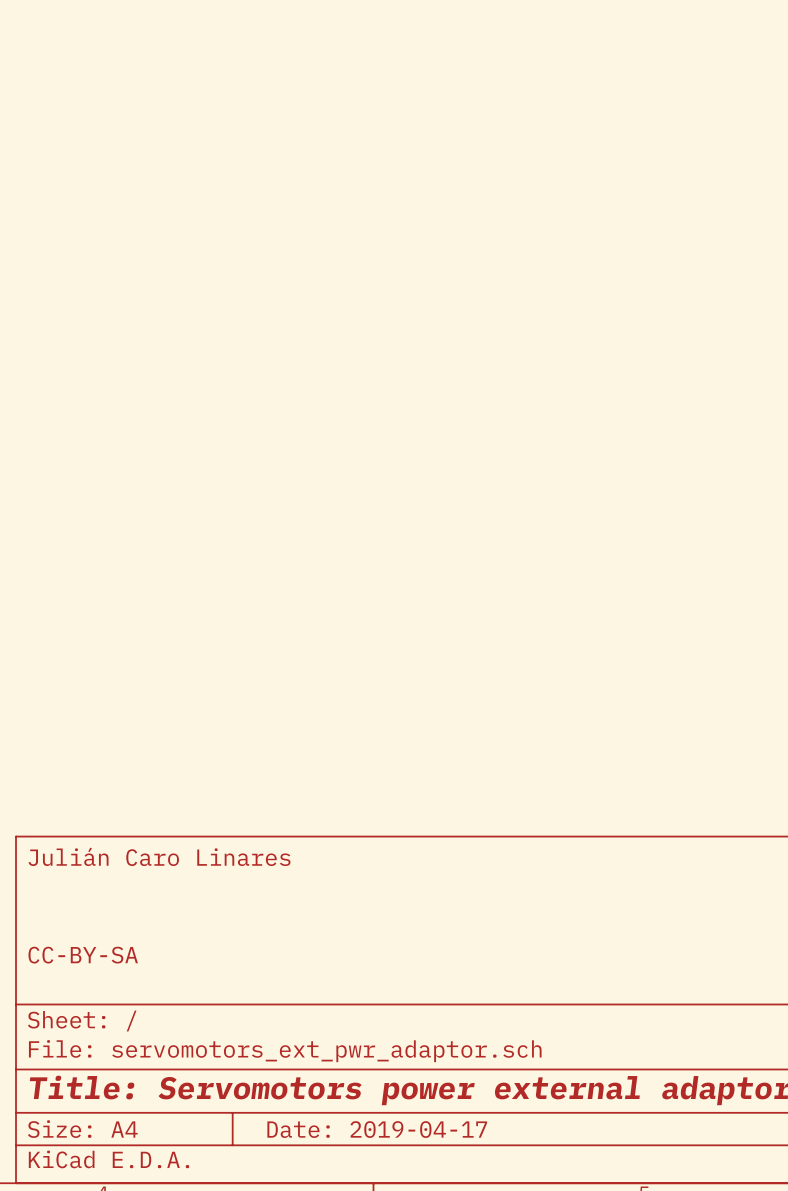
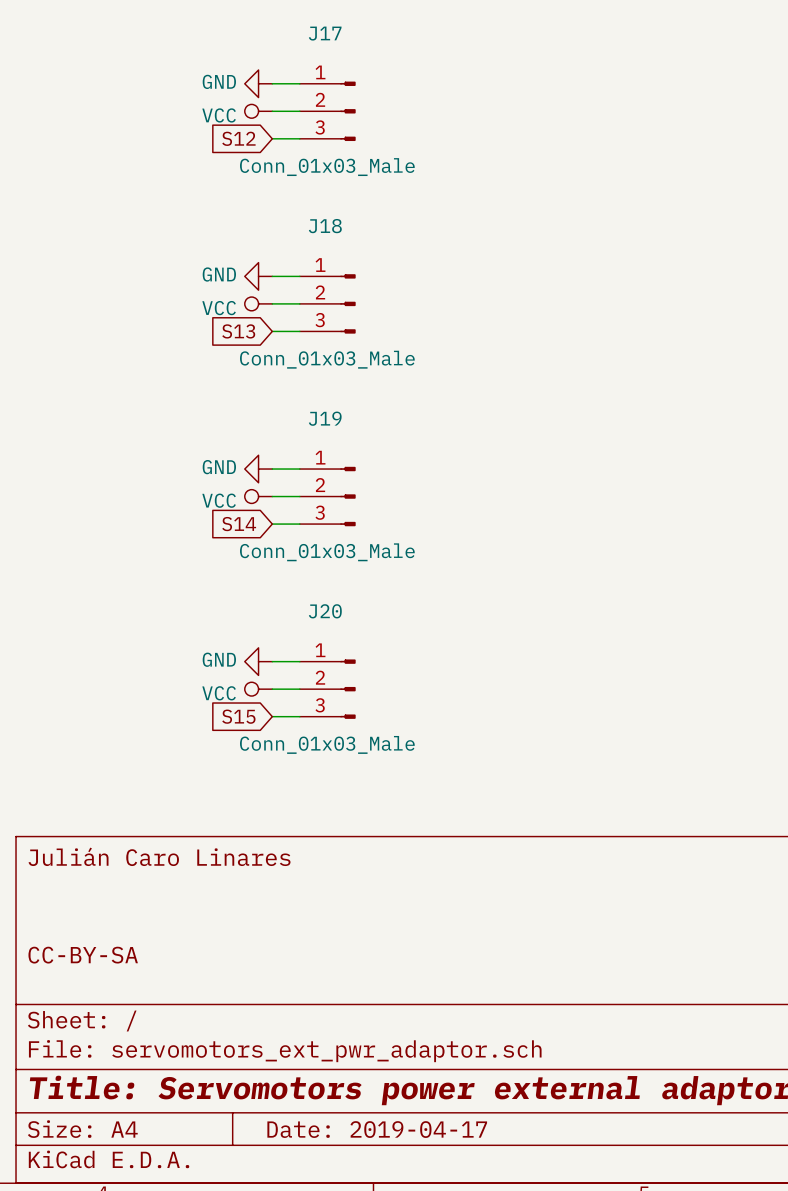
power symbol: none -> GND (258, 83)
wire: none -> (272, 83) (299, 83)
power symbol: none -> VCC (258, 111)
wire: none -> (272, 111) (299, 111)
J17: none -> Conn_01x03_Male (327, 111)
global label: none -> S12 (238, 138)
wire: none -> (272, 138) (299, 138)
power symbol: none -> GND (258, 276)
wire: none -> (272, 276) (299, 276)
power symbol: none -> VCC (258, 303)
wire: none -> (272, 303) (299, 303)
J18: none -> Conn_01x03_Male (327, 303)
global label: none -> S13 (238, 331)
wire: none -> (272, 331) (299, 331)
power symbol: none -> GND (258, 469)
wire: none -> (272, 469) (299, 469)
power symbol: none -> VCC (258, 496)
wire: none -> (272, 496) (299, 496)
J19: none -> Conn_01x03_Male (327, 496)
global label: none -> S14 (239, 524)
wire: none -> (272, 524) (299, 524)
power symbol: none -> GND (258, 661)
wire: none -> (272, 661) (299, 661)
power symbol: none -> VCC (258, 689)
wire: none -> (272, 689) (299, 689)
J20: none -> Conn_01x03_Male (327, 689)
global label: none -> S15 (238, 716)
wire: none -> (272, 716) (299, 716)

